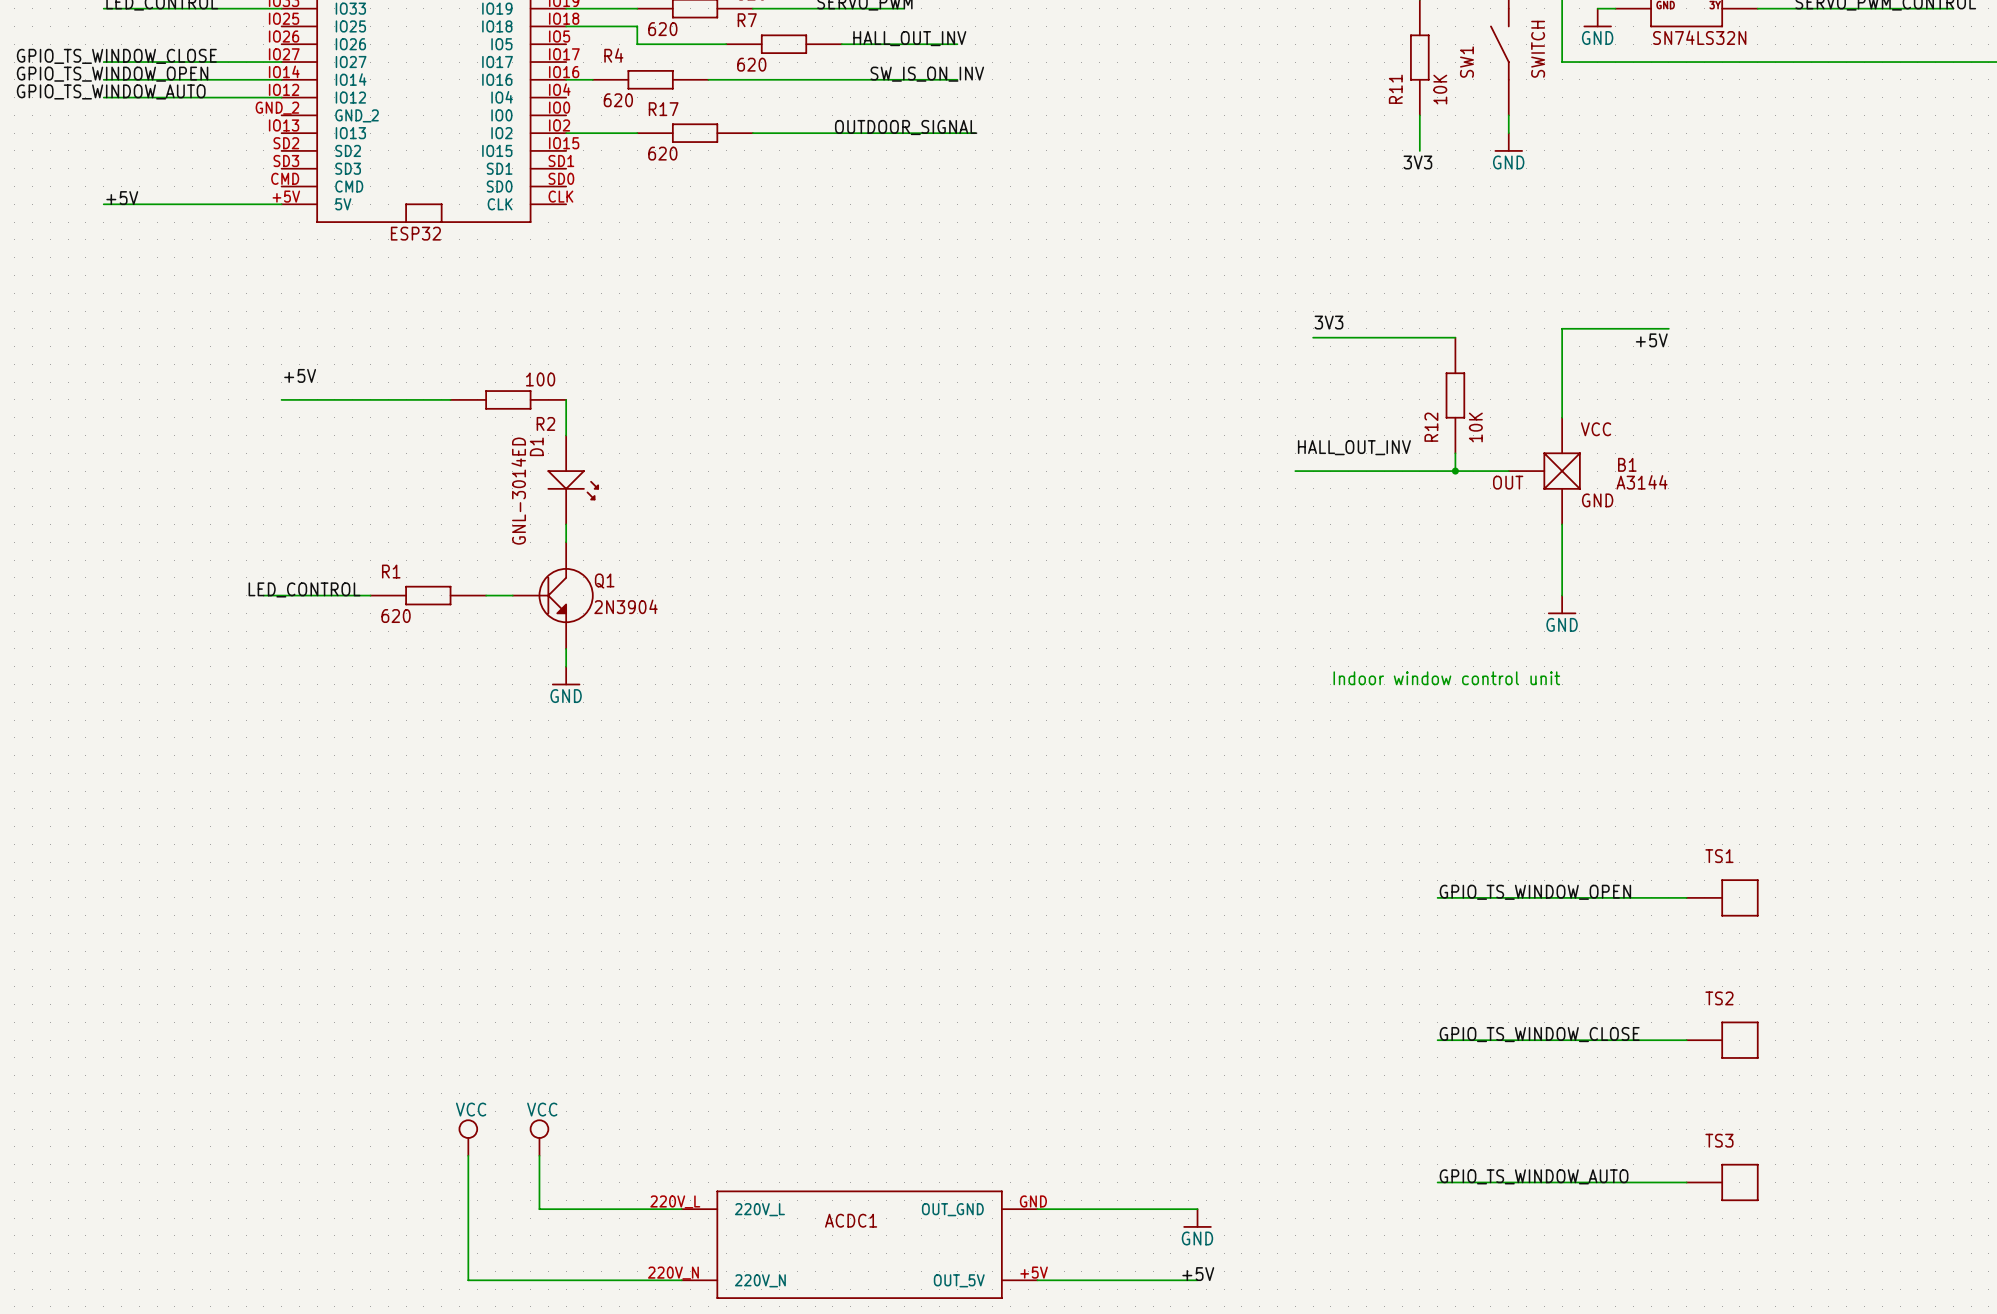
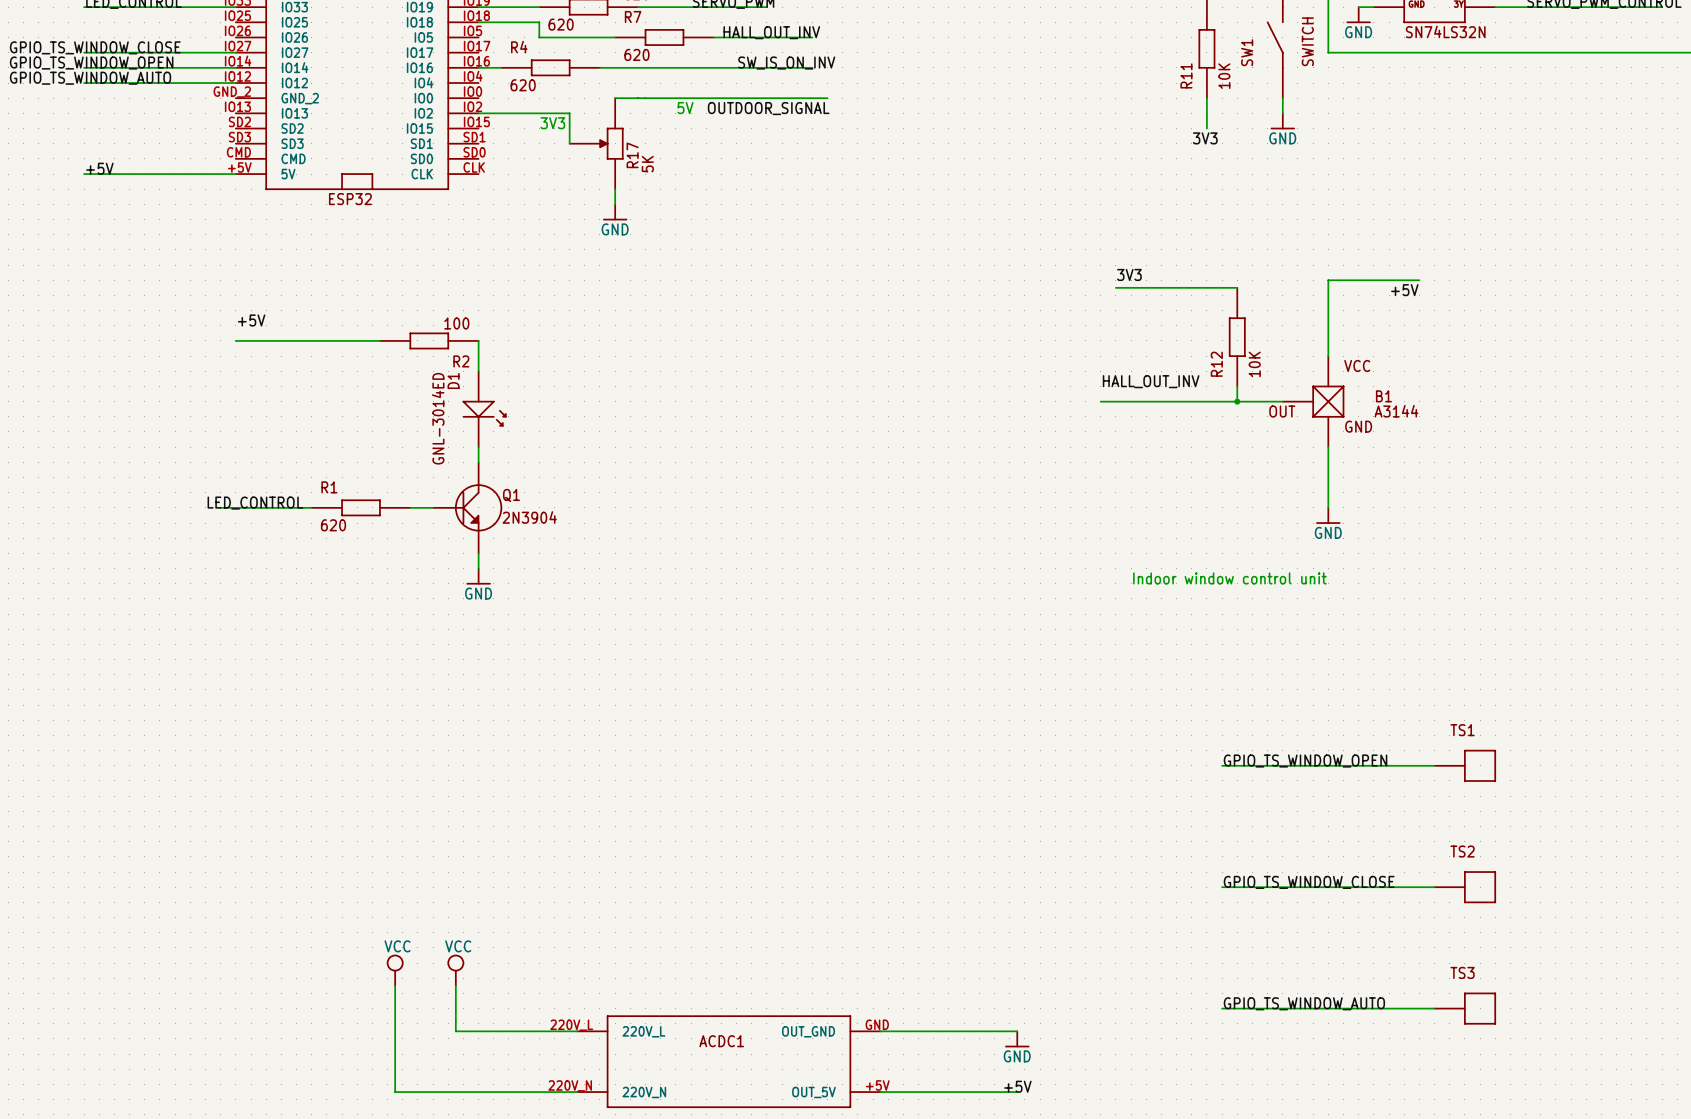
R17 name position: R17 (663, 109) -> R17 (632, 155)
wire: none -> (615, 98) (827, 98)
R17 symbol: [637, 123, 753, 143] -> [569, 98, 624, 190]
text: none -> 5V (685, 108)
wire: (752, 133) (975, 133) -> none
text: none -> 3V3 (552, 123)
R17 value: 620 (662, 153) -> 5K (647, 164)
wire: none -> (615, 189) (615, 204)
power symbol: none -> GND (615, 212)

